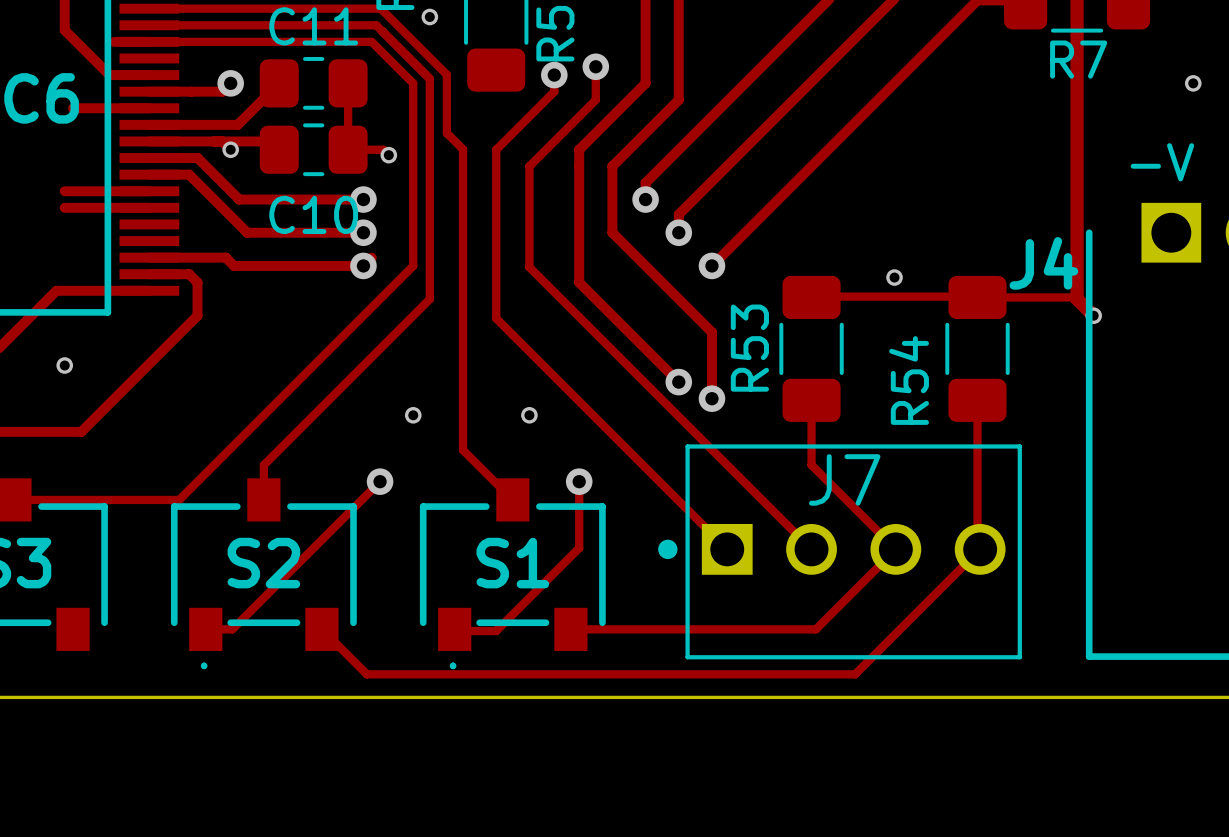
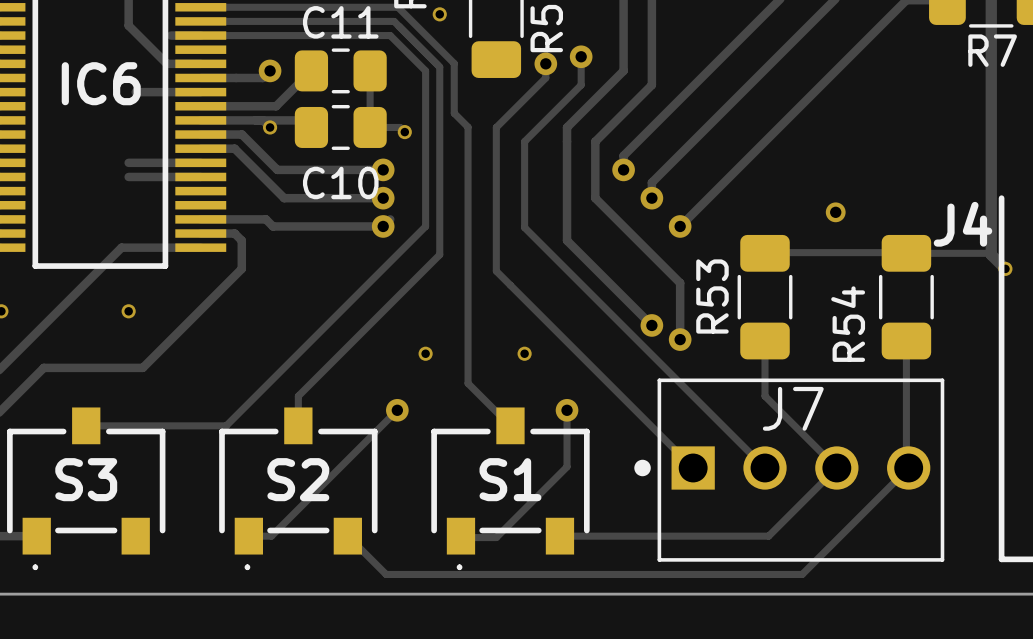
via: none -> (835, 212)
via: (894, 277) -> none

